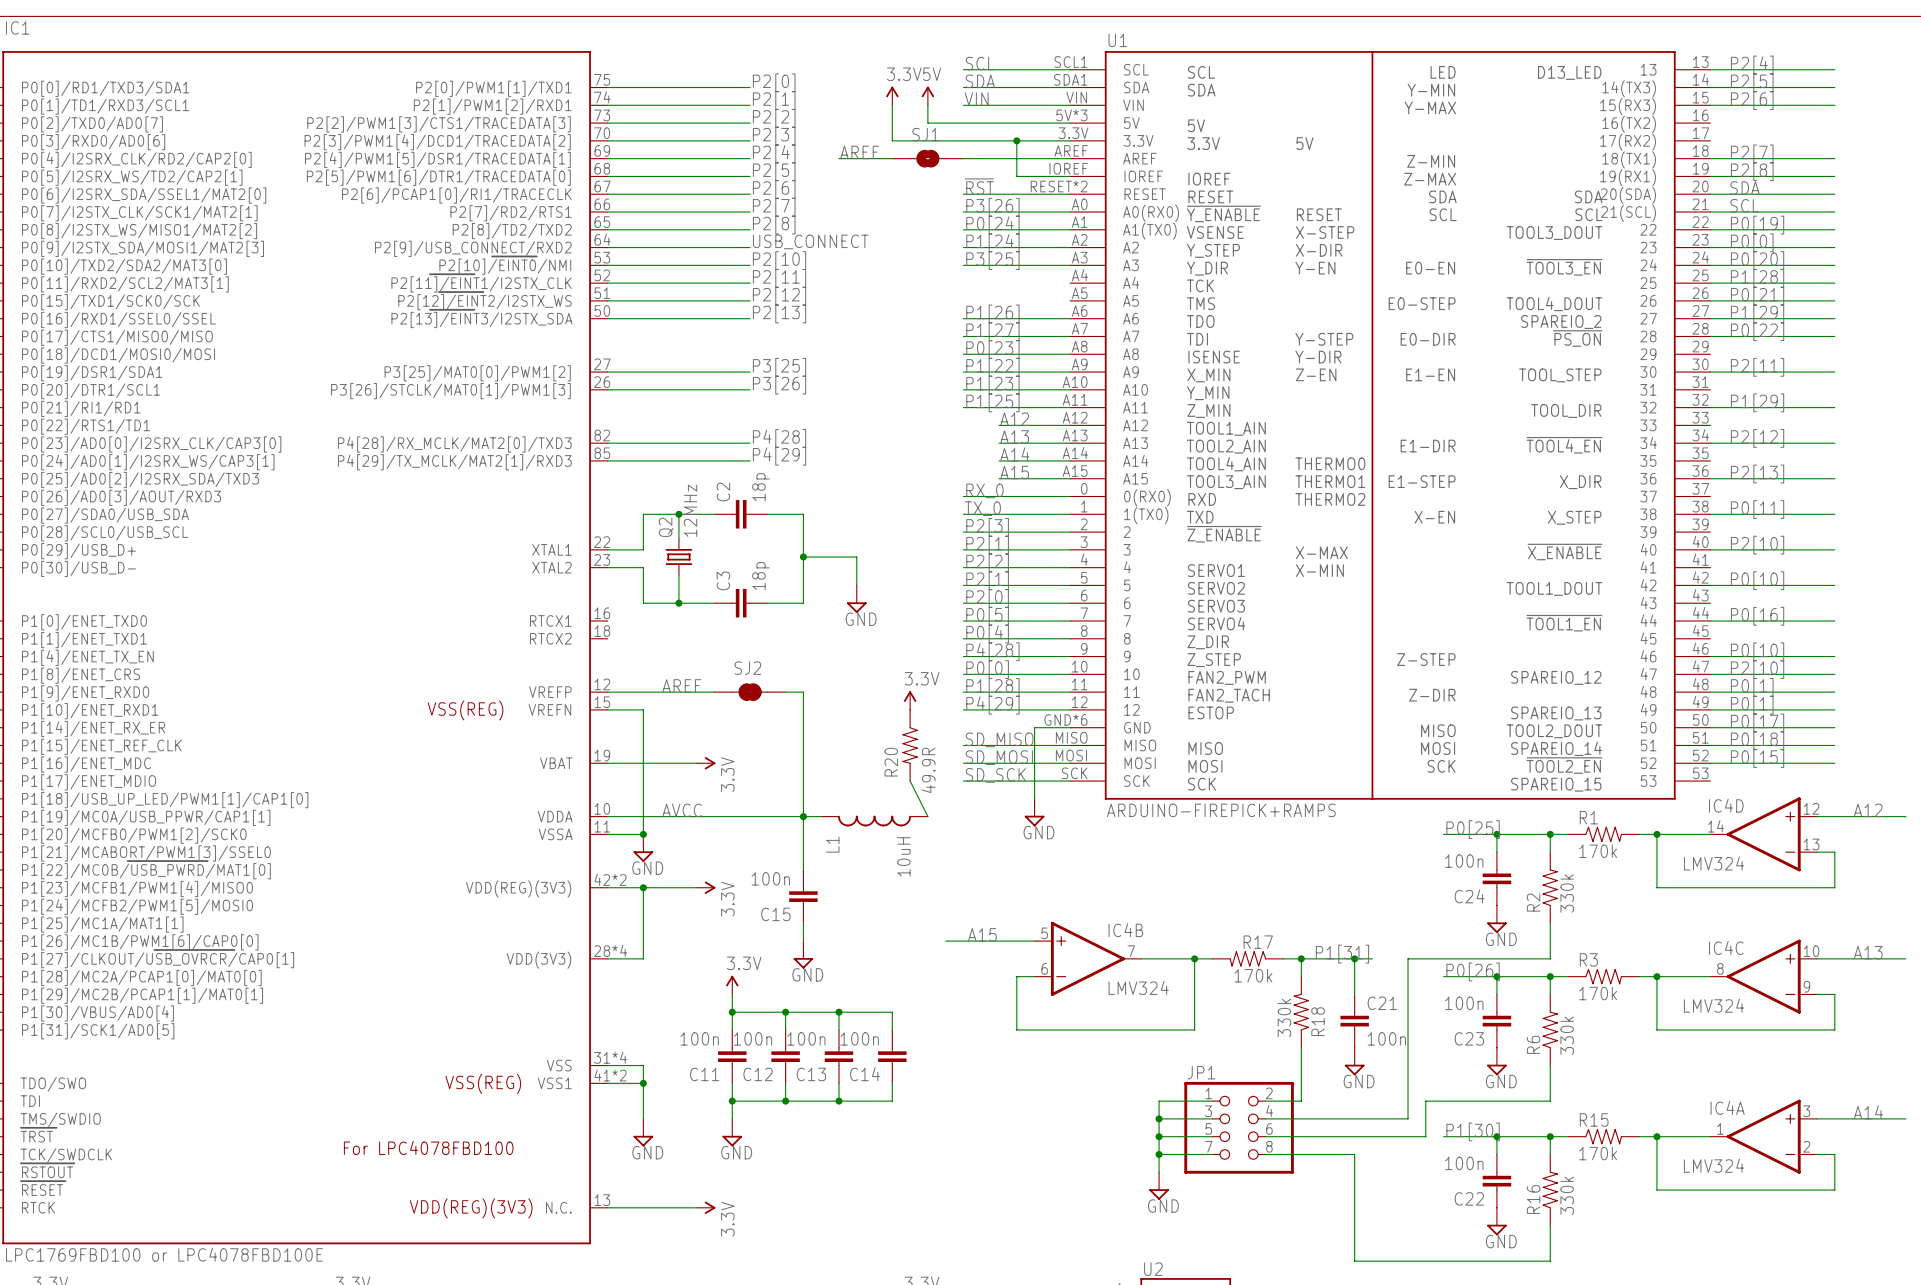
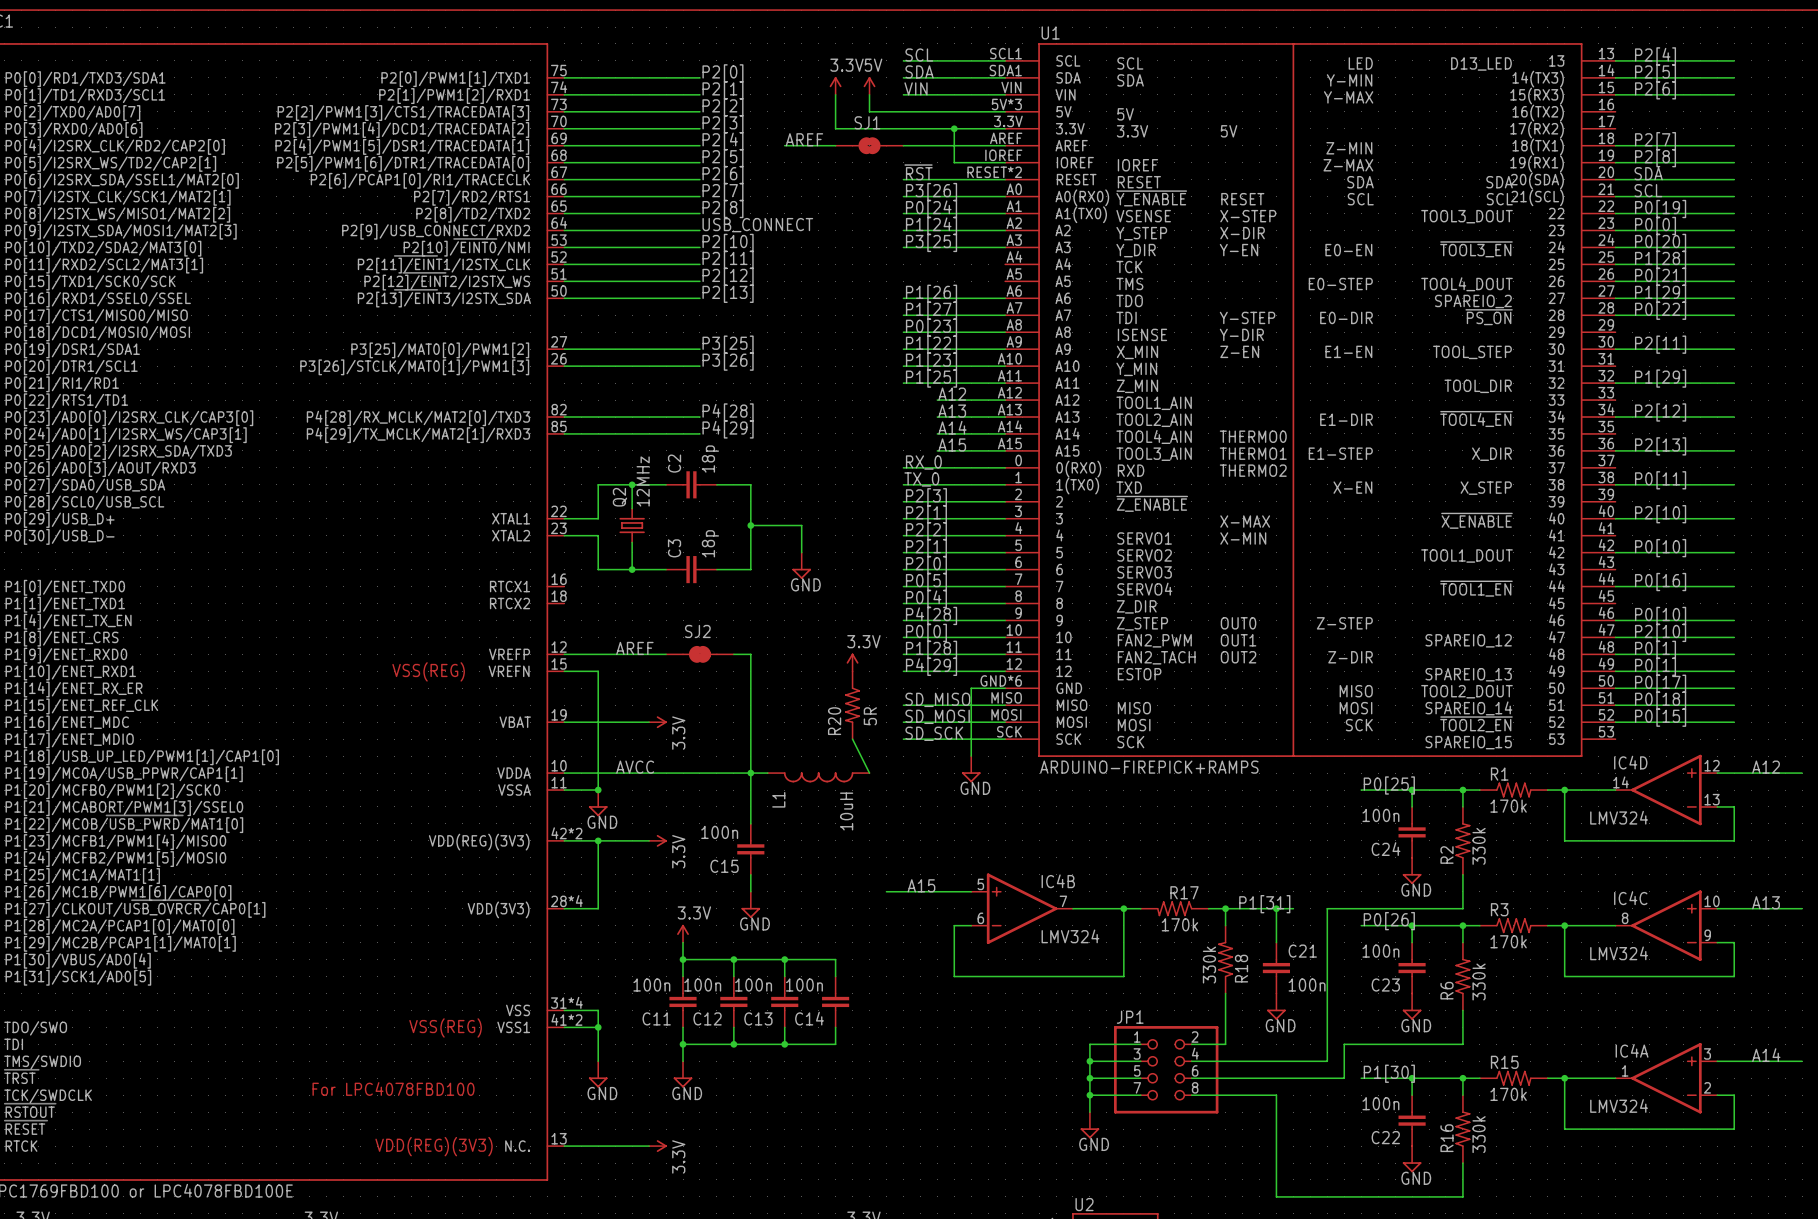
U1 text: none -> OUT0 (1238, 623)
U1 text: none -> OUT1 (1238, 640)
U1 text: none -> OUT2 (1238, 657)
R20 value: 49.9R (928, 770) -> 5R (870, 716)

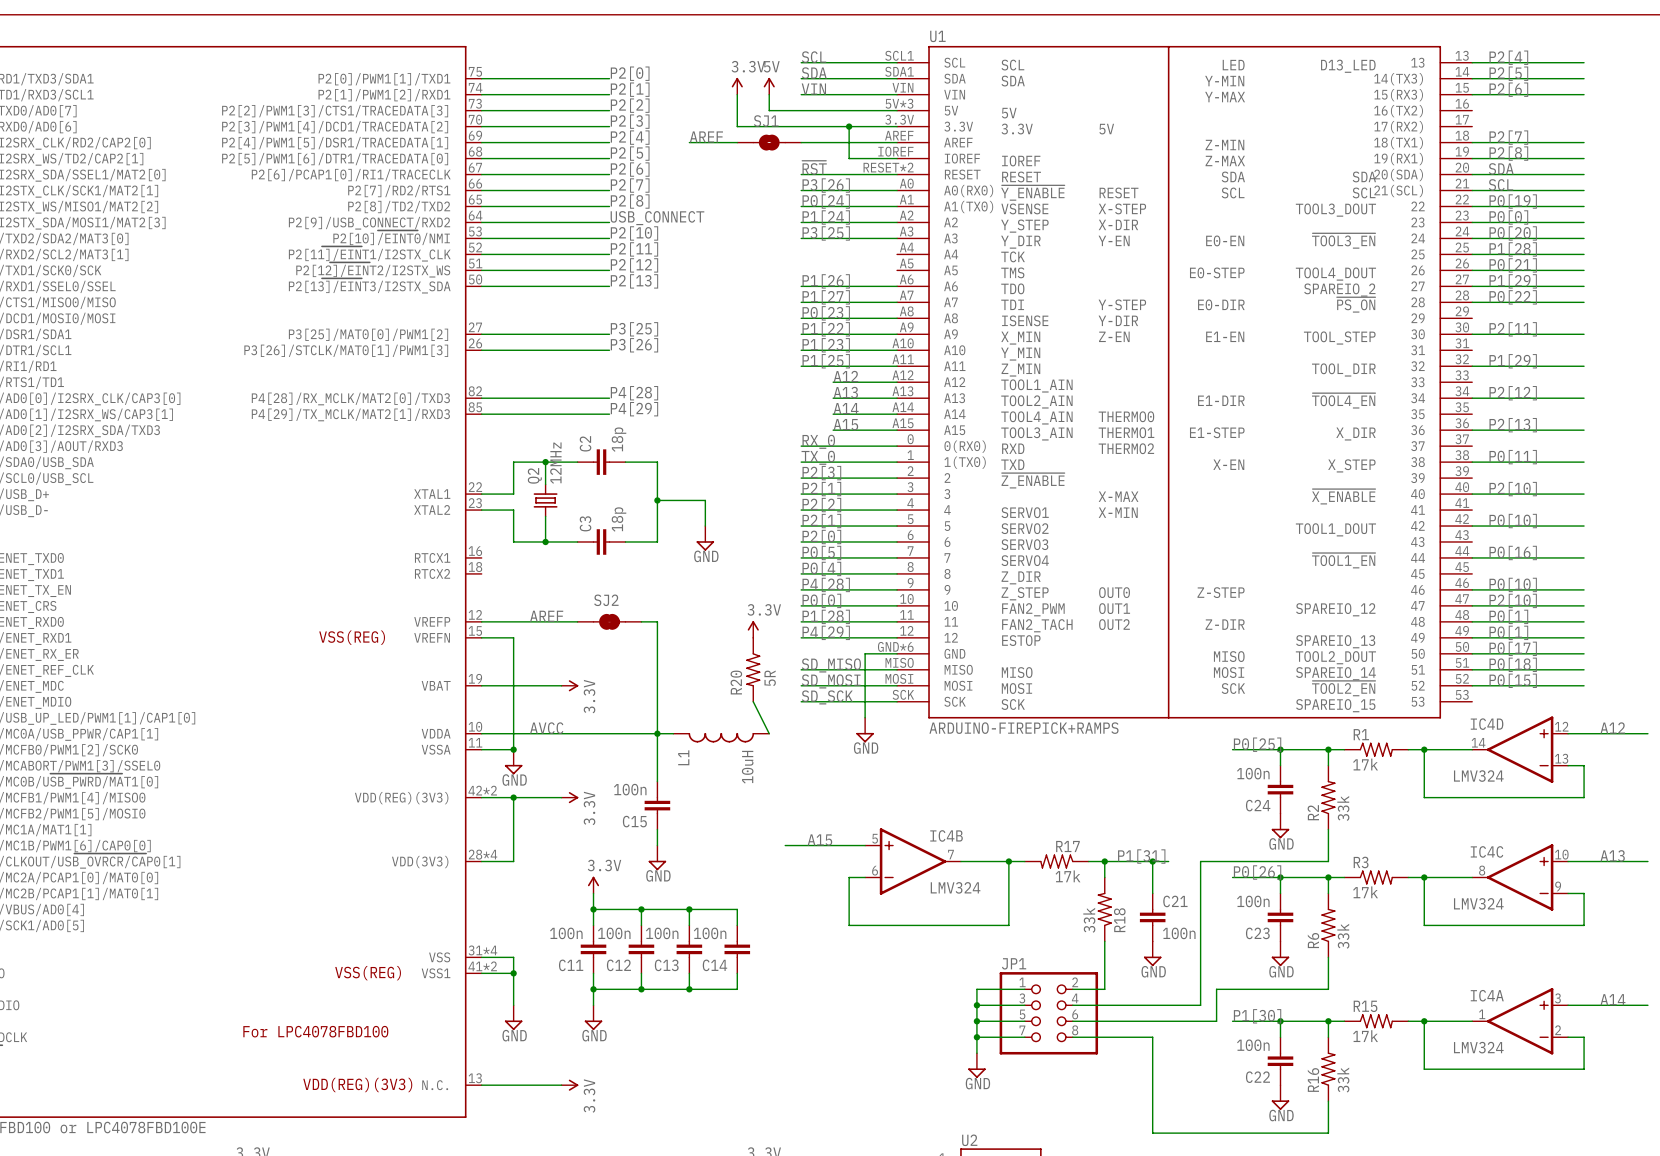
R1 value: 170k (1508, 806) -> 17k (1365, 764)
R2 value: 330k (1479, 846) -> 33k (1343, 808)
R17 value: 170k (1179, 924) -> 17k (1068, 876)
R3 value: 170k (1508, 941) -> 17k (1365, 892)
R18 value: 330k (1209, 965) -> 33k (1089, 920)
R6 value: 330k (1479, 982) -> 33k (1343, 936)
R15 value: 170k (1508, 1094) -> 17k (1365, 1036)
R16 value: 330k (1479, 1134) -> 33k (1343, 1080)

